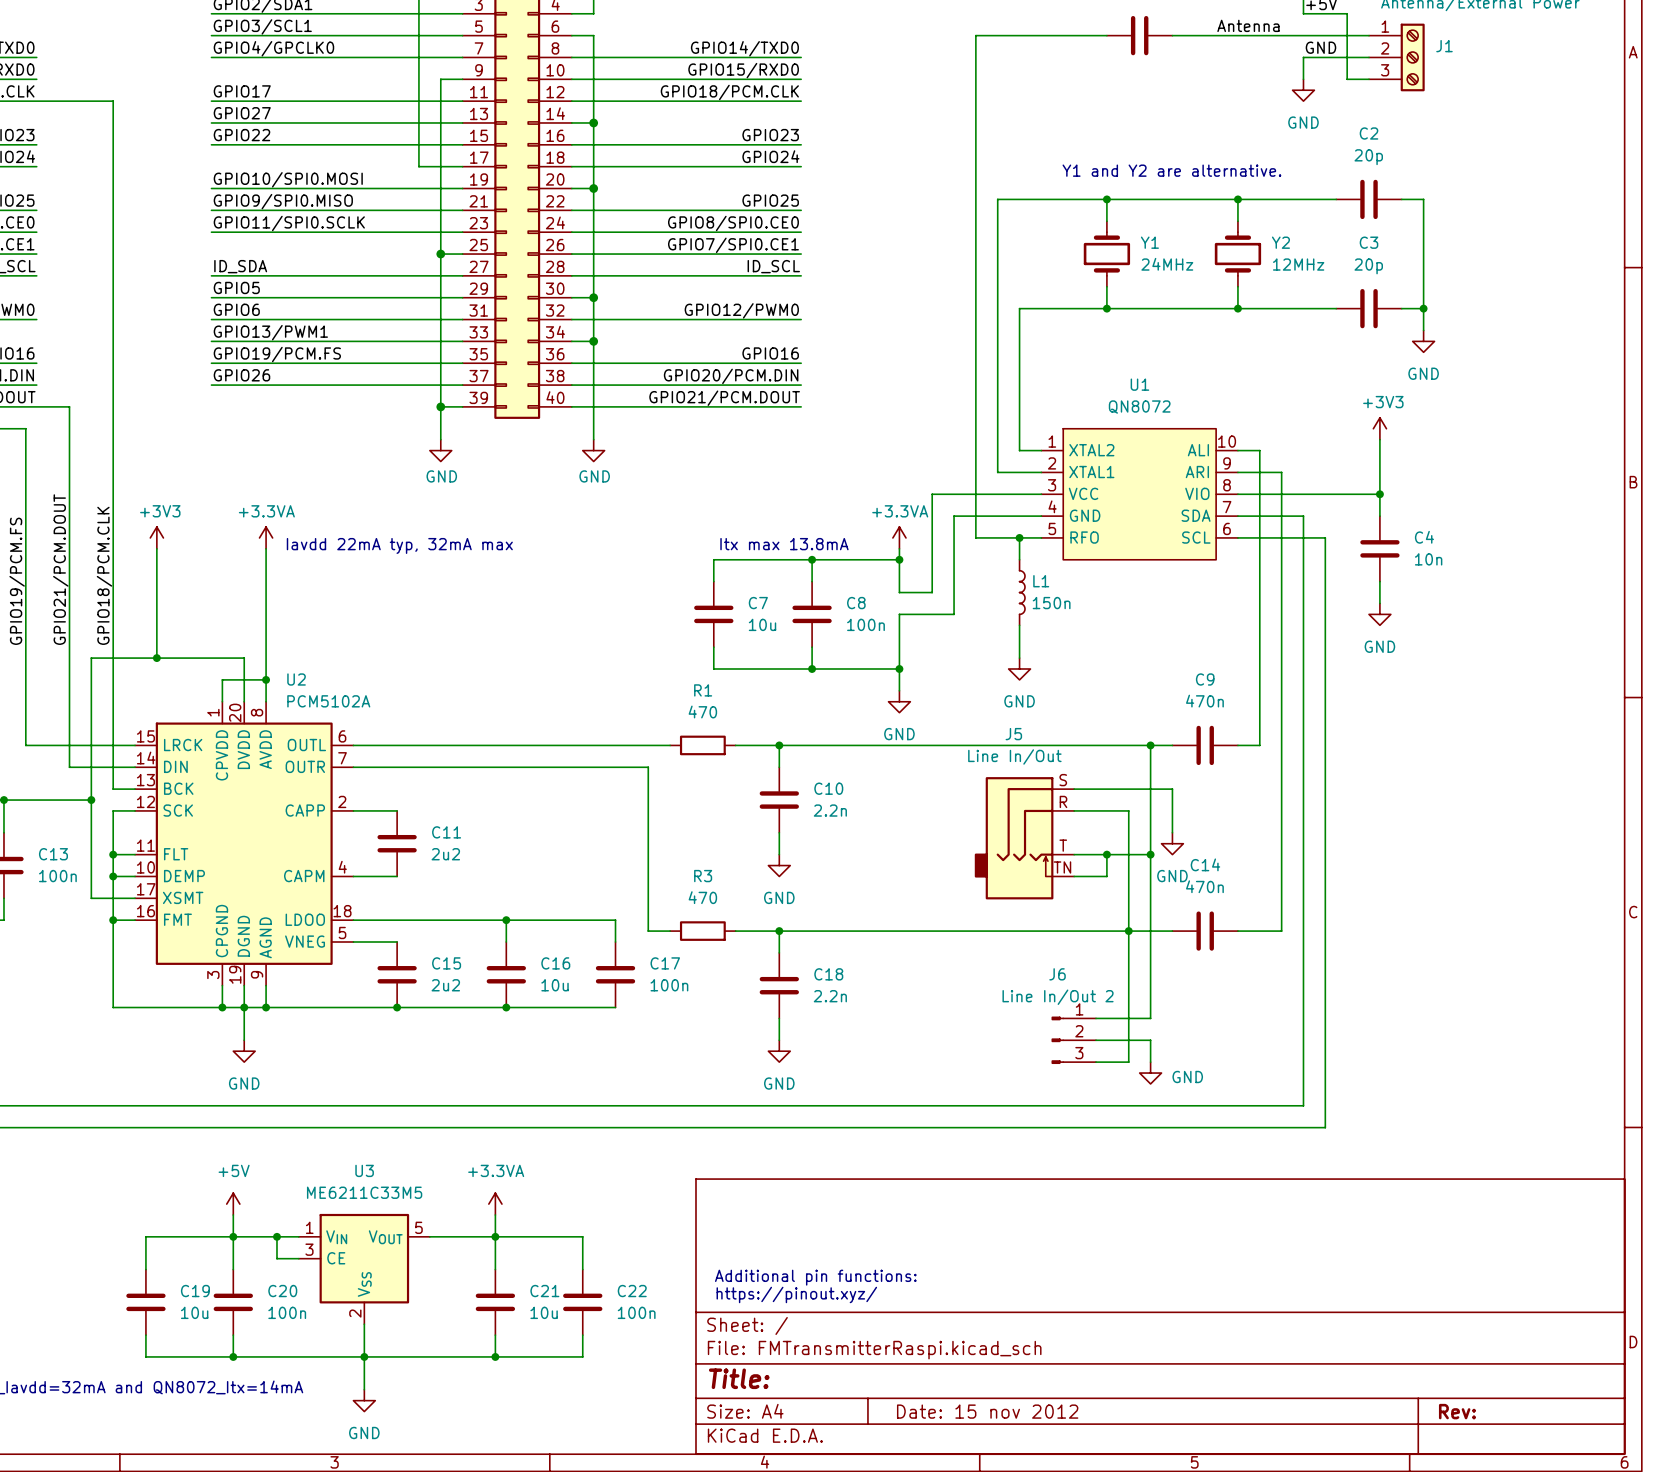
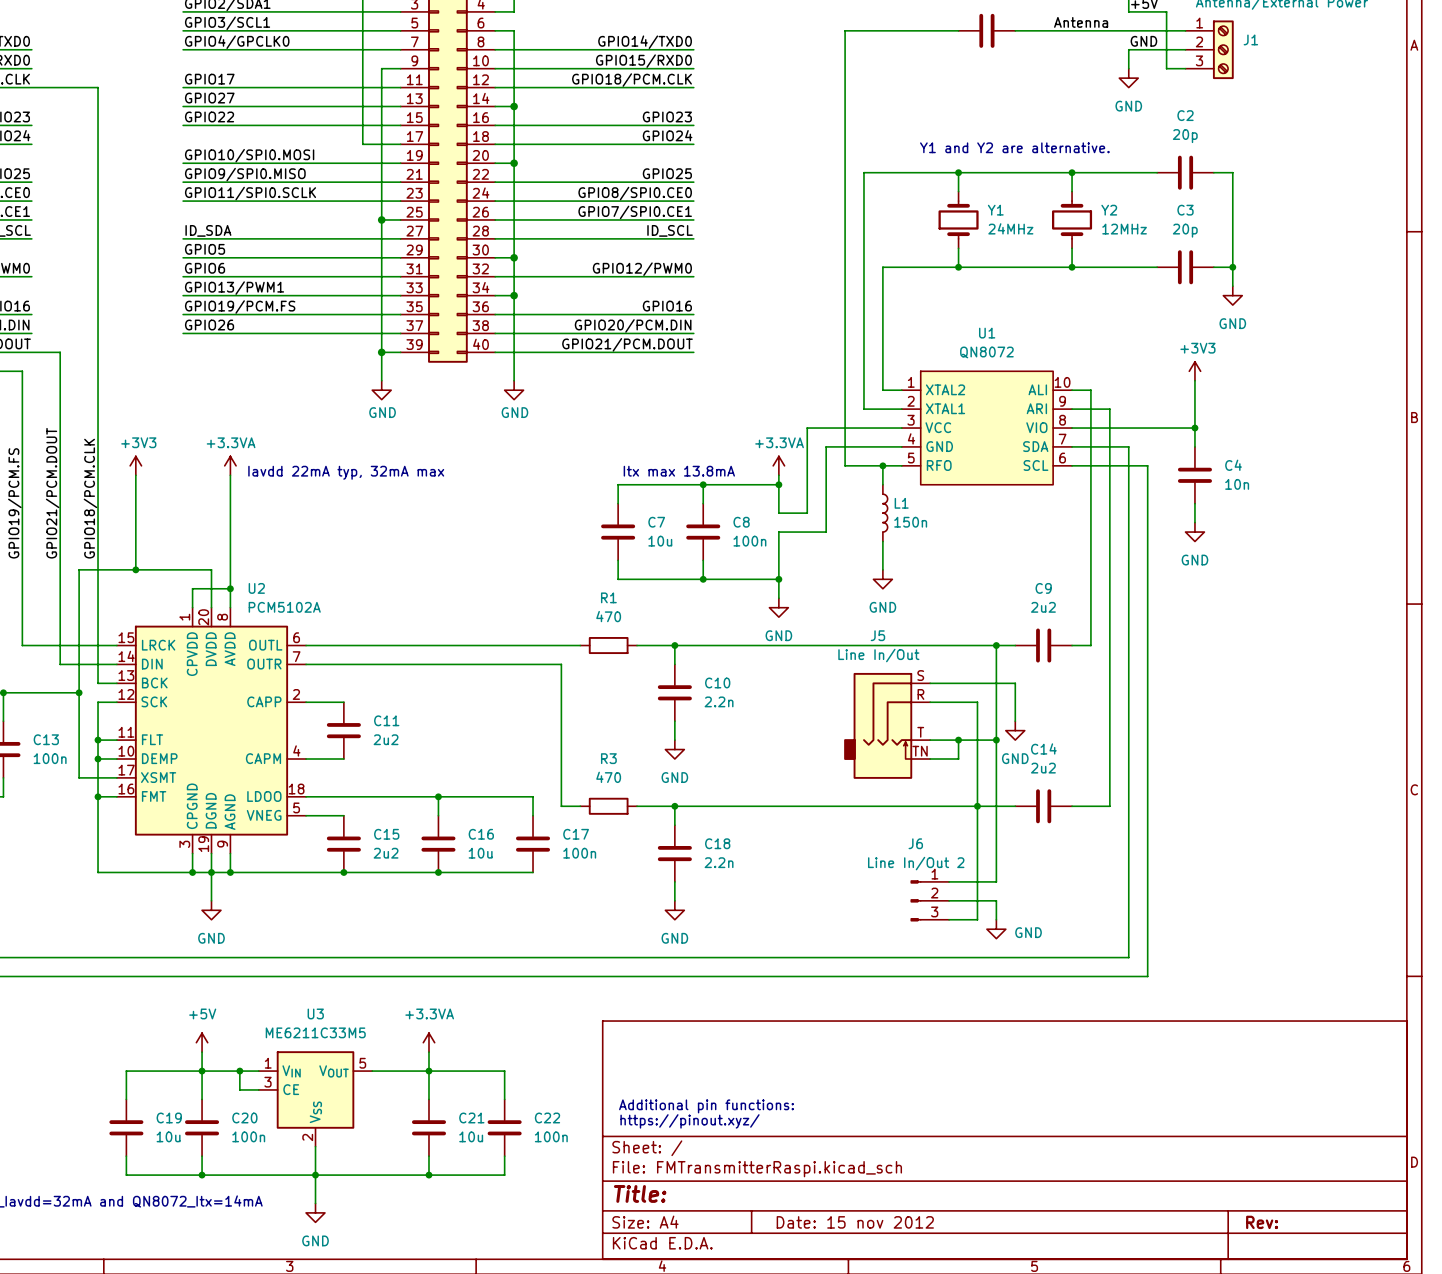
C9 value: 470n (1204, 701) -> 2u2 (1043, 607)
C14 value: 470n (1204, 886) -> 2u2 (1043, 768)

